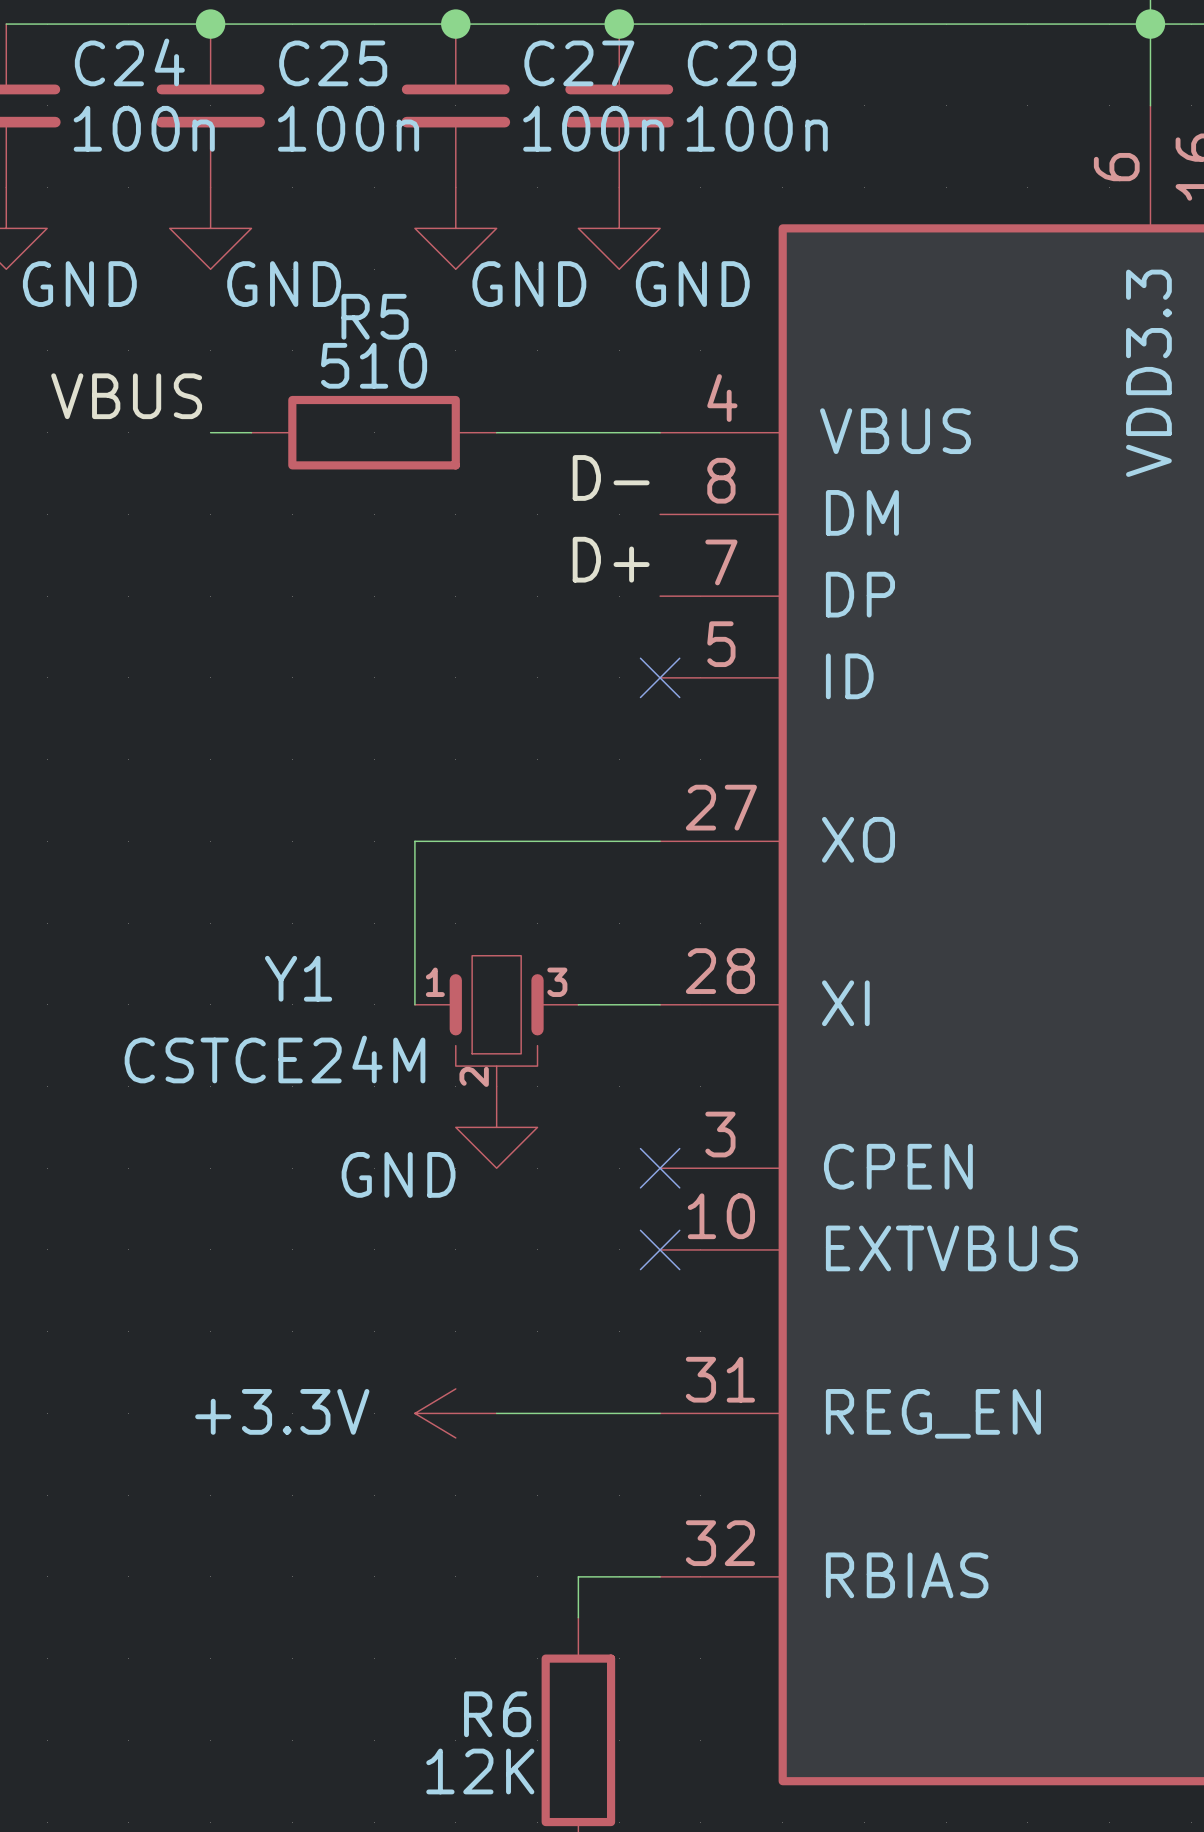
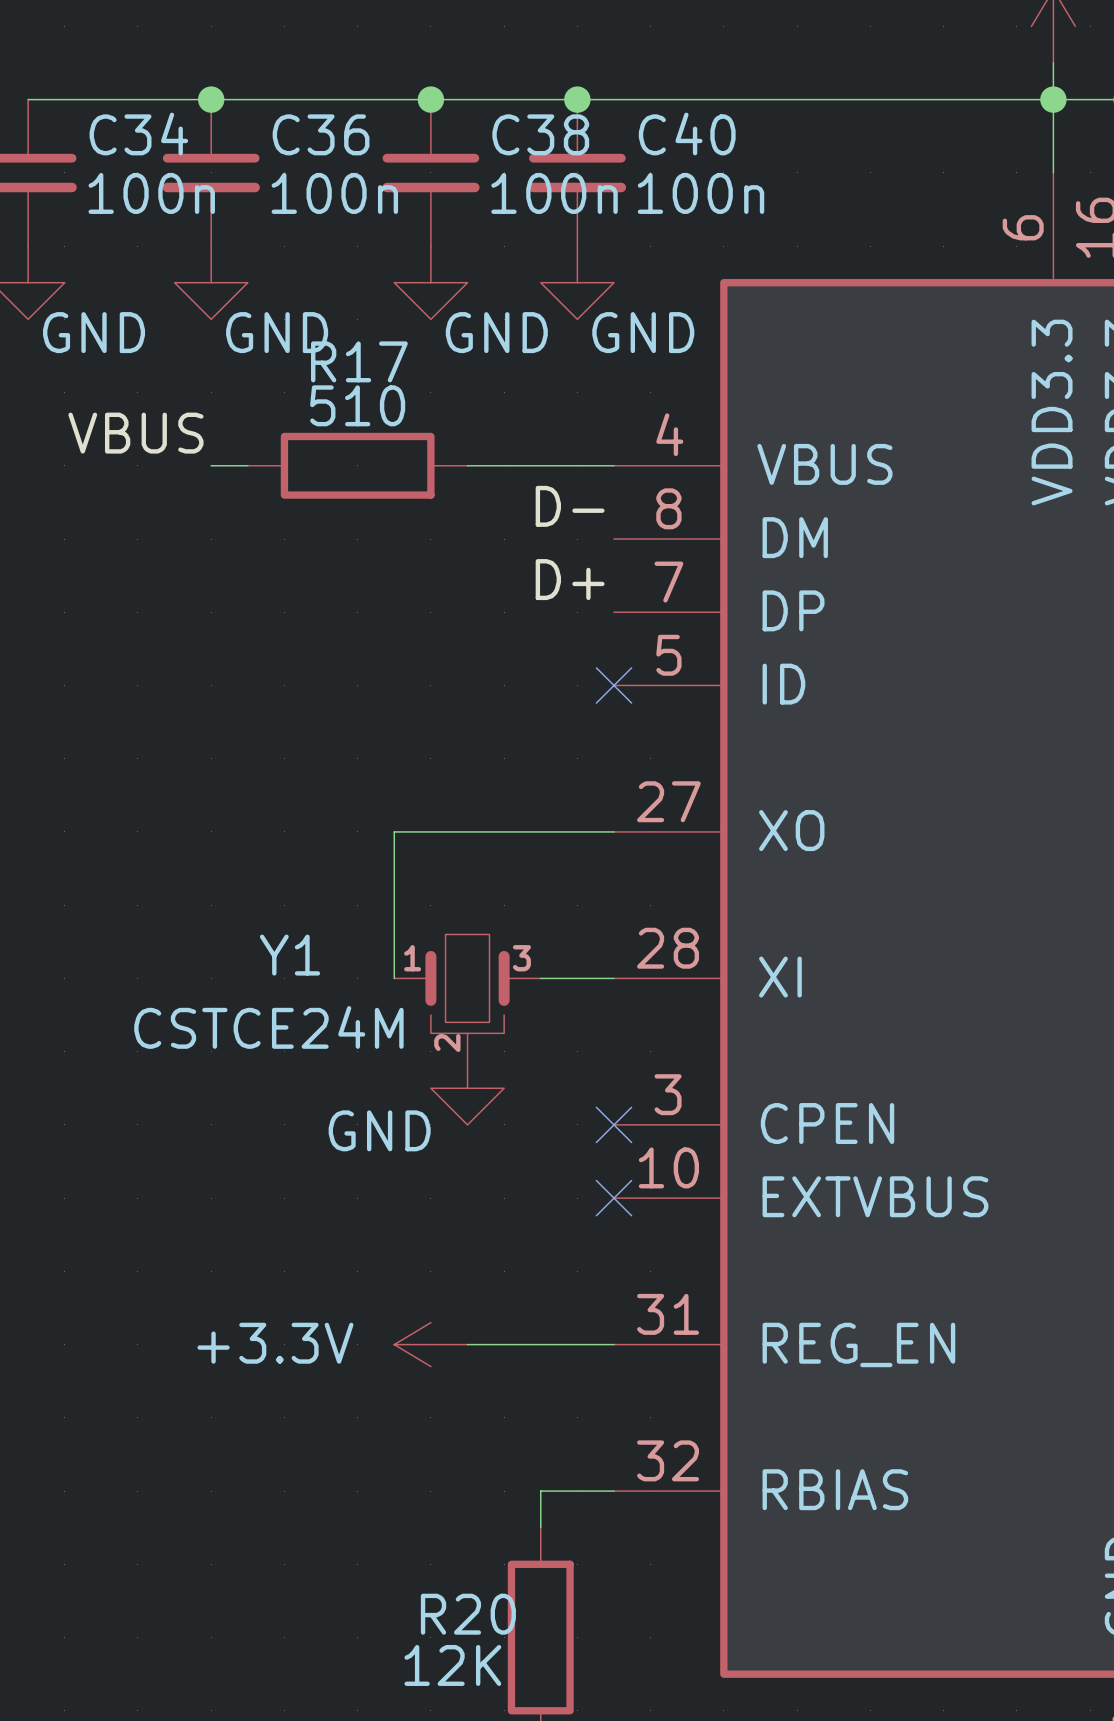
C24 name: C24 (129, 62) -> C34 (138, 133)
C25 name: C25 (333, 63) -> C36 (321, 134)
C27 name: C27 (579, 63) -> C38 (540, 134)
C29 name: C29 (741, 63) -> C40 (687, 133)
R5 name: R5 (375, 316) -> R17 (359, 361)
R6 name: R6 (497, 1714) -> R20 (468, 1614)

